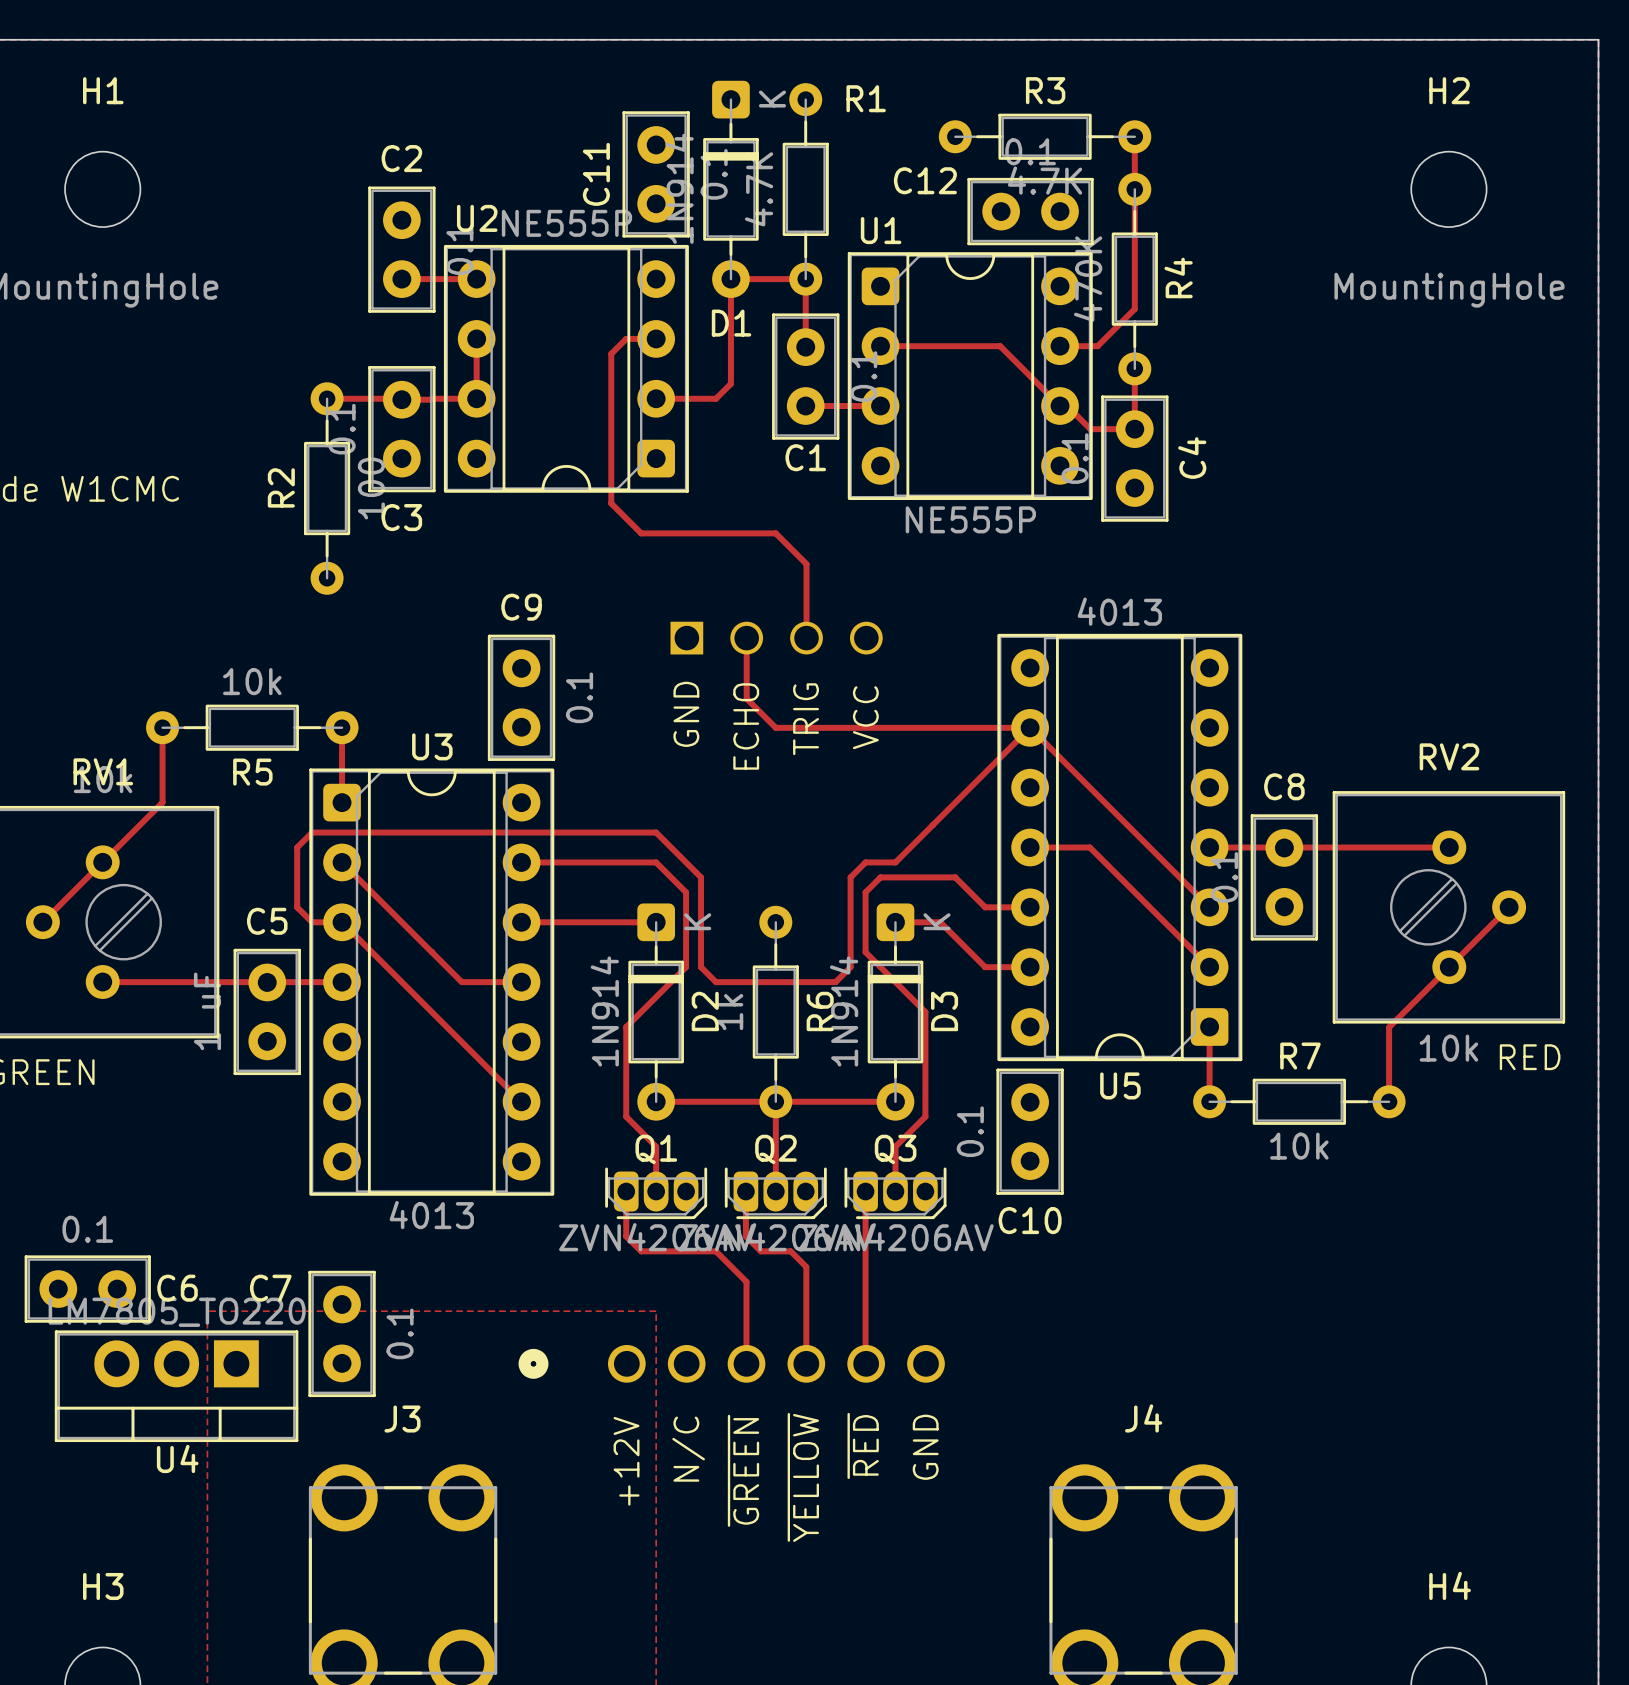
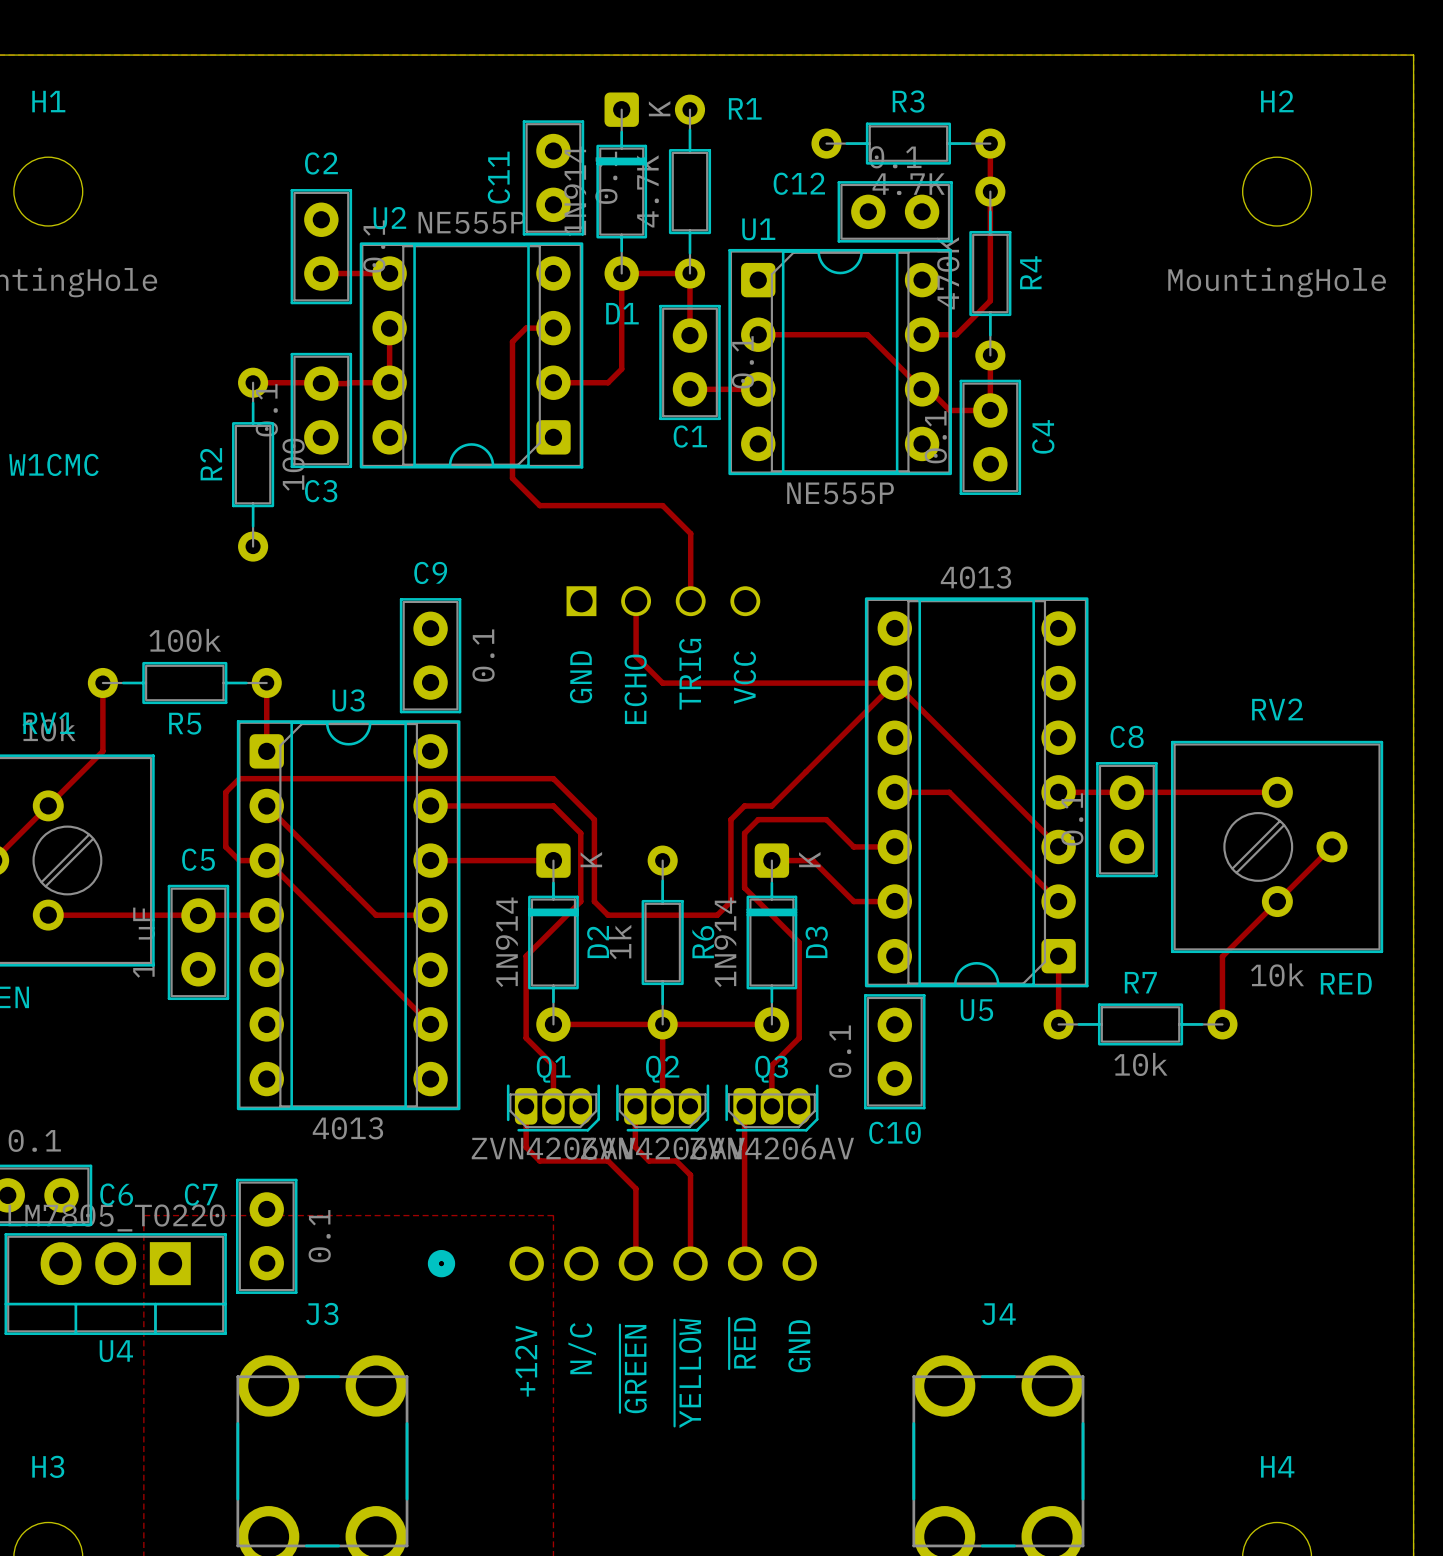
R5 value: 10k (252, 681) -> 100k (185, 640)

